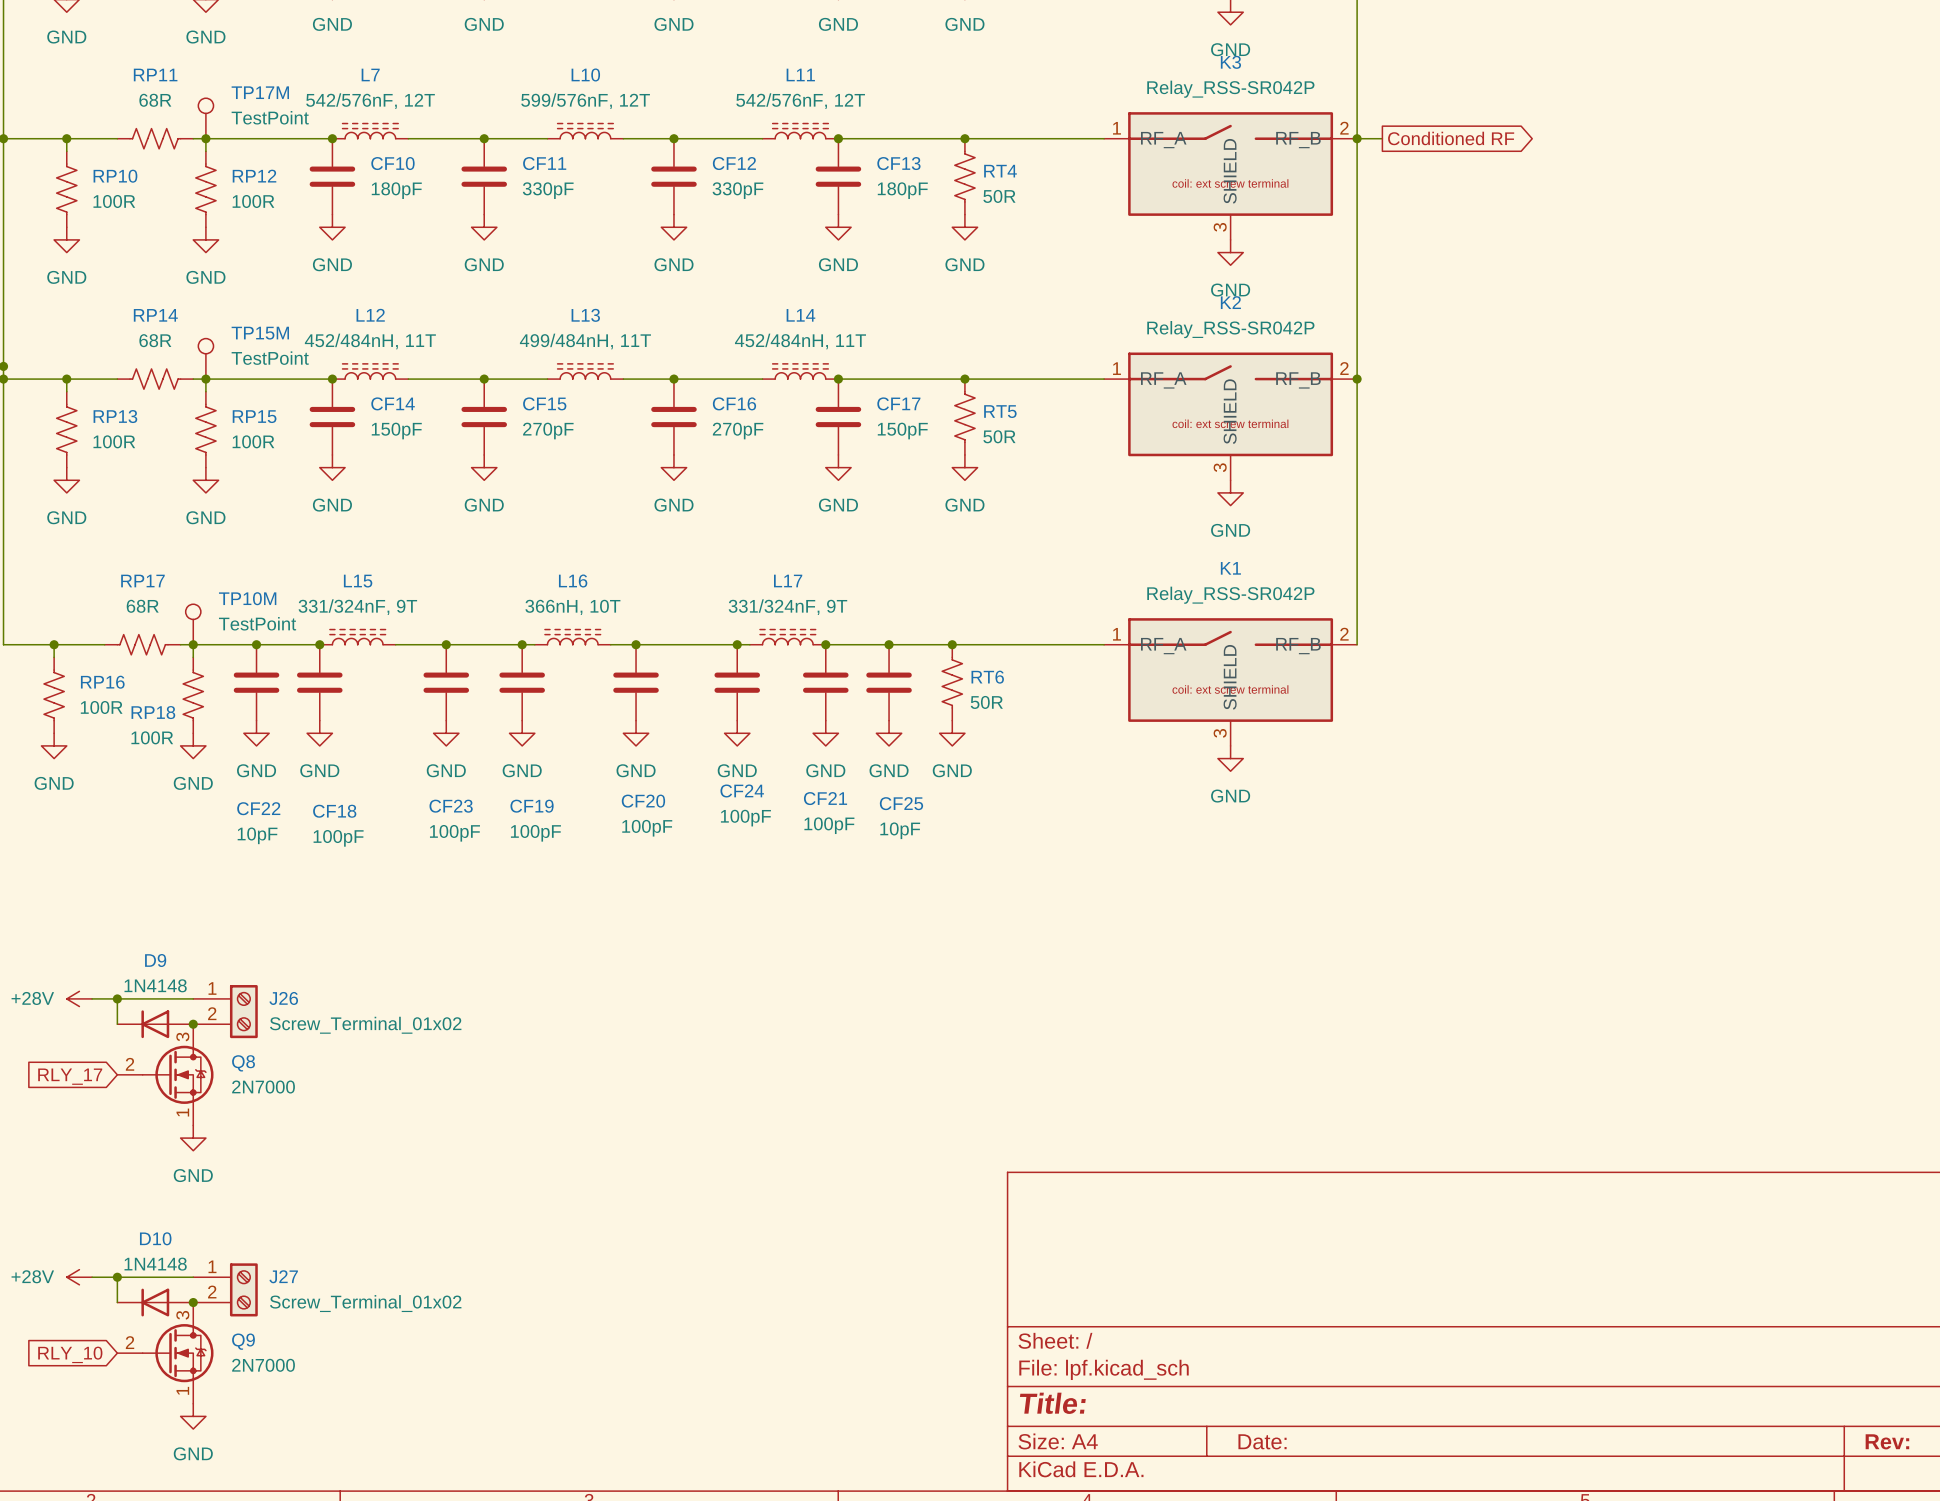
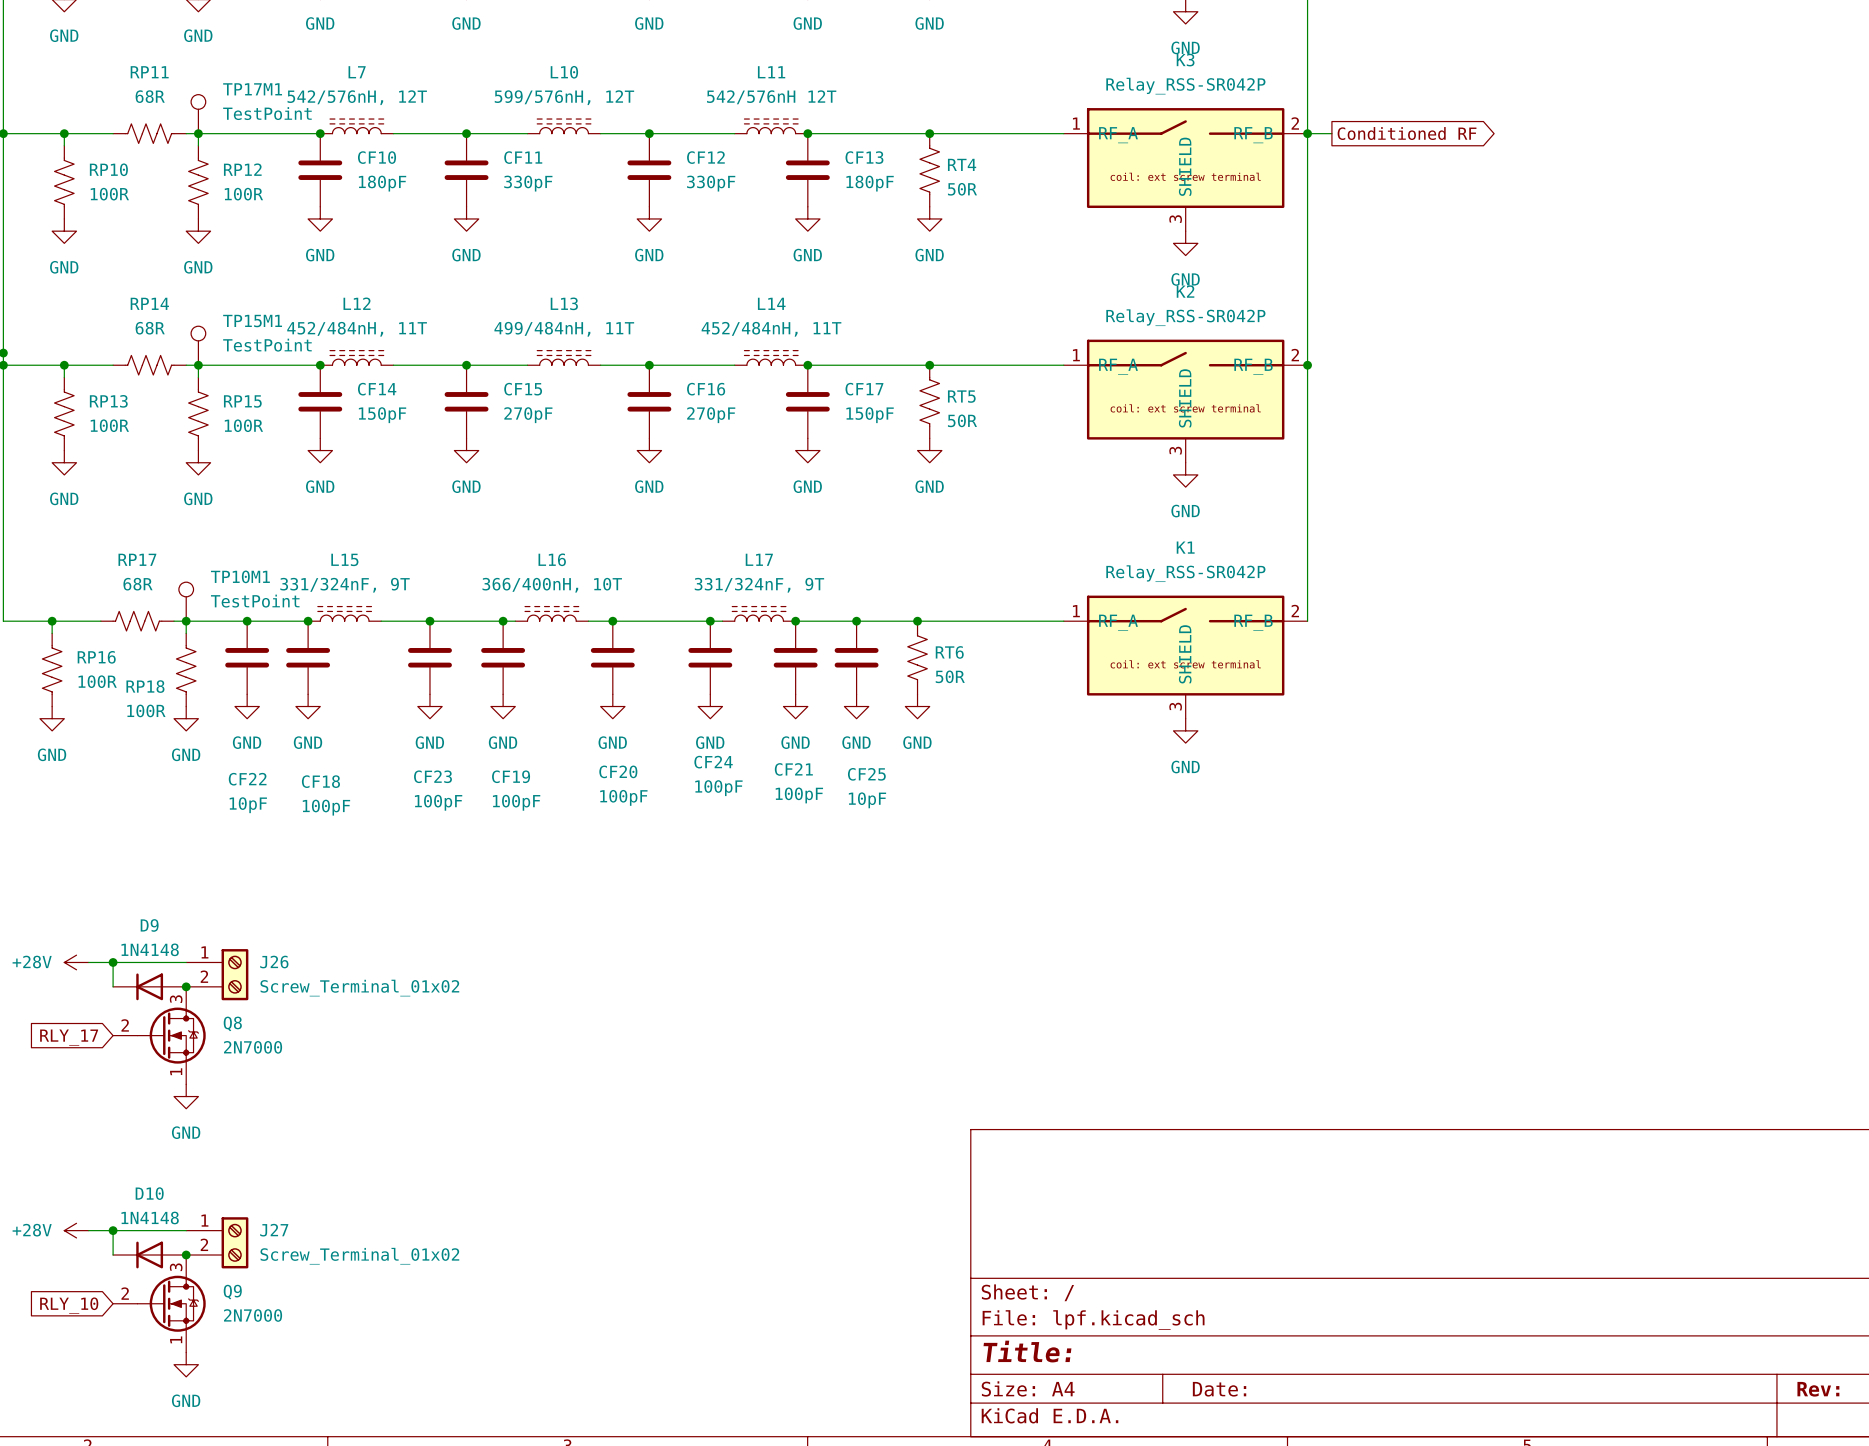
TP17M name: TP17M (260, 92) -> TP17M1 (252, 89)
L7 value: 542/576nF, 12T (370, 101) -> 542/576nH, 12T (357, 97)
L10 value: 599/576nF, 12T (585, 101) -> 599/576nH, 12T (564, 97)
L11 value: 542/576nF, 12T (800, 101) -> 542/576nH 12T (771, 97)
TP15M name: TP15M (260, 333) -> TP15M1 (252, 321)
TP10M name: TP10M (247, 598) -> TP10M1 (240, 576)
L16 value: 366nH, 10T (572, 607) -> 366/400nH, 10T (552, 585)

